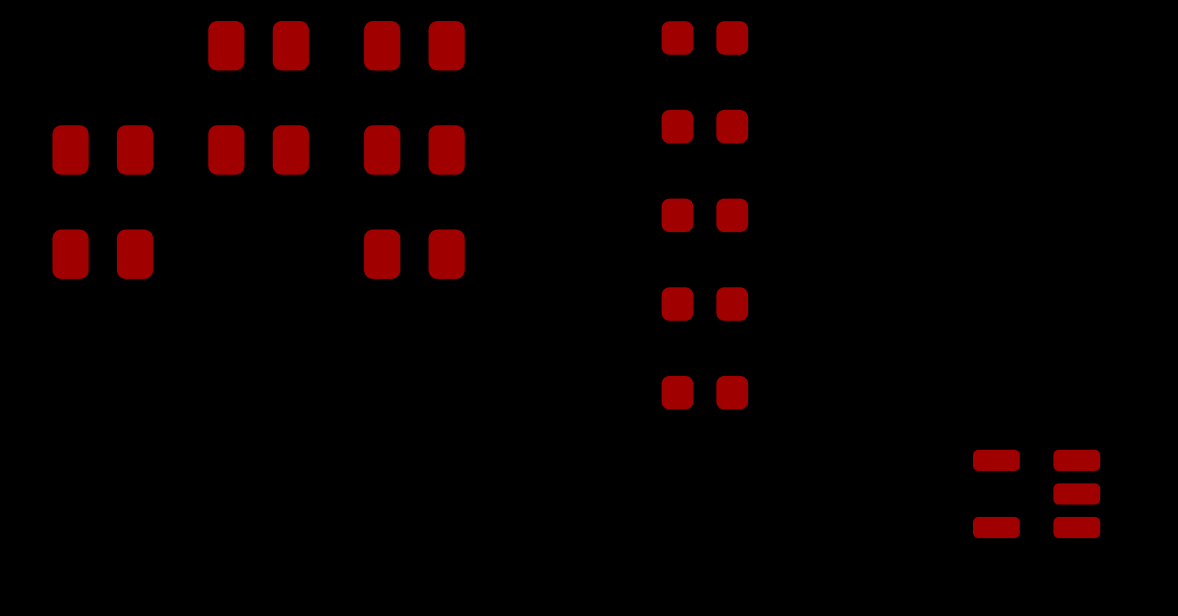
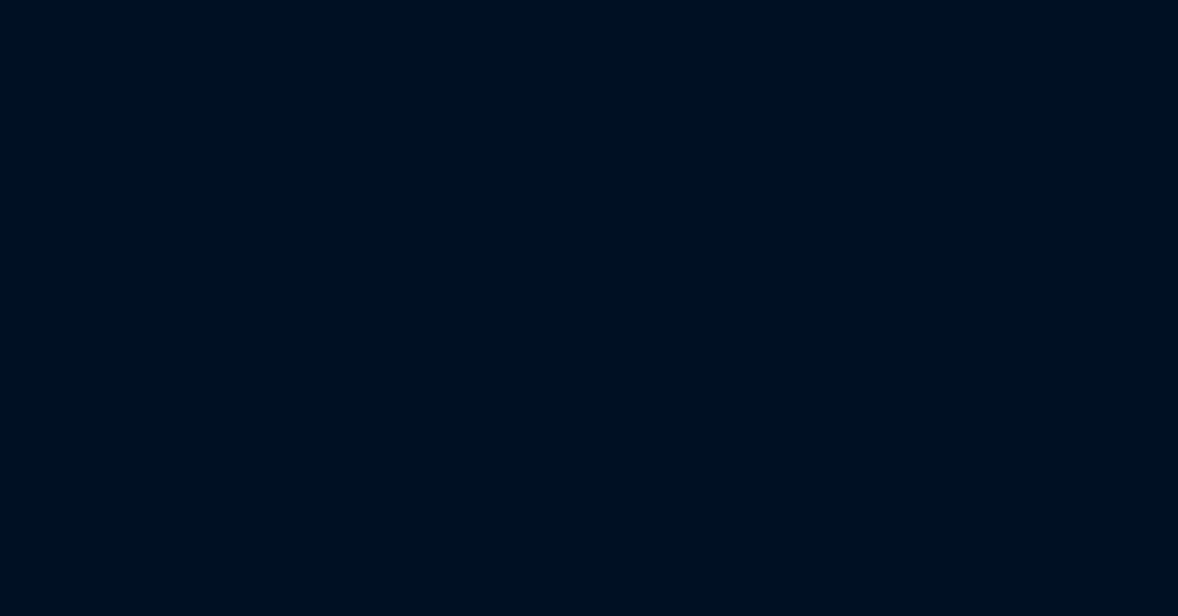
part: (704, 37) -> none
part: (258, 45) -> none
part: (414, 45) -> none
part: (704, 126) -> none
part: (102, 149) -> none
part: (258, 149) -> none
part: (414, 149) -> none
part: (704, 215) -> none
part: (102, 254) -> none
part: (414, 254) -> none
part: (704, 304) -> none
part: (704, 392) -> none
part: (1036, 493) -> none

